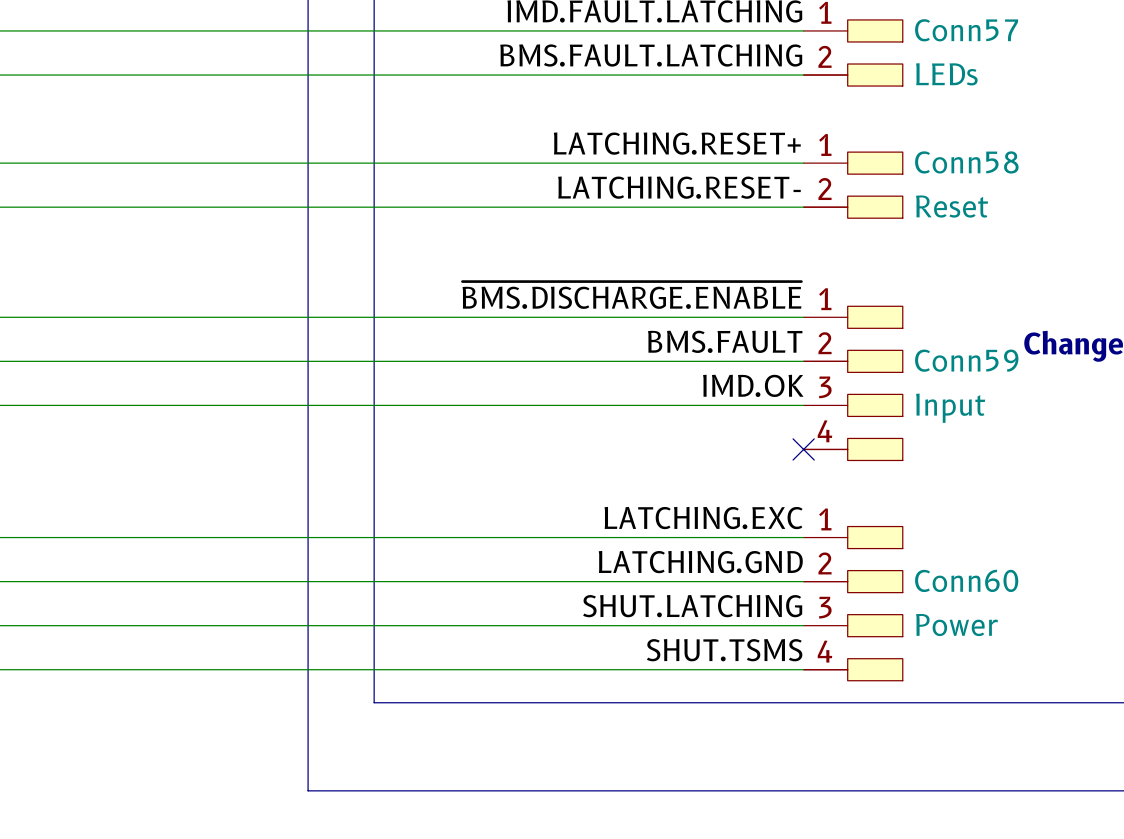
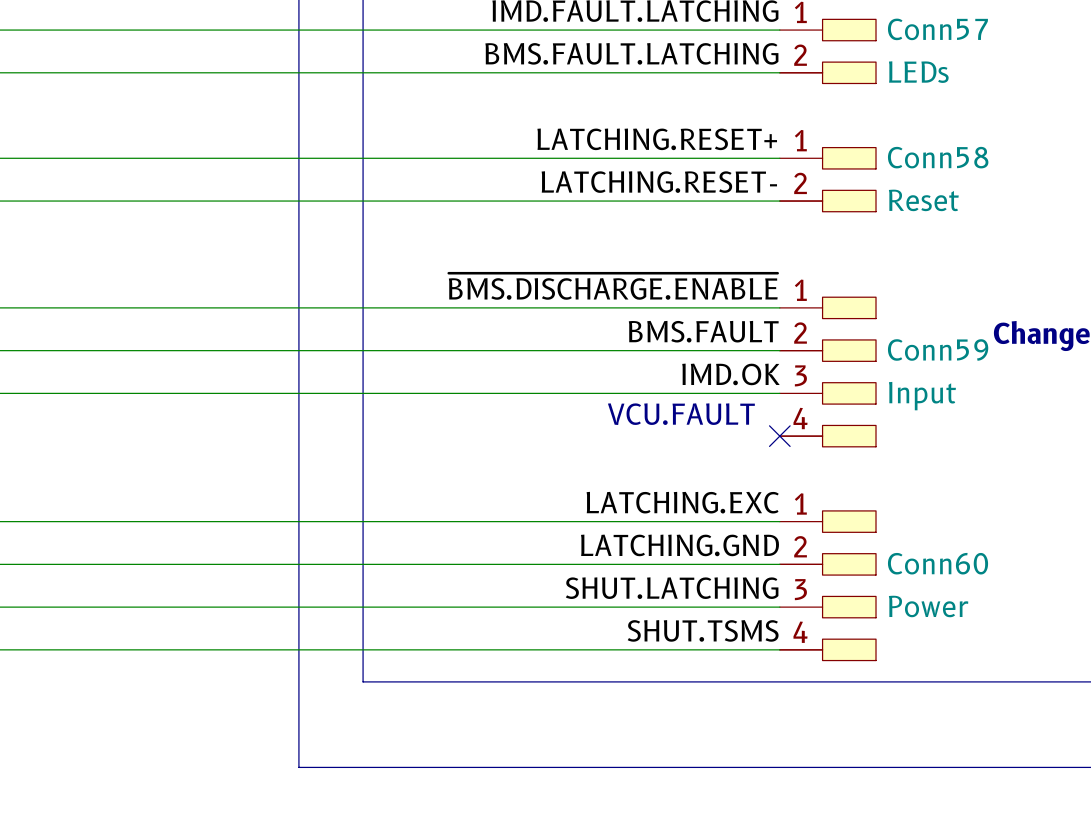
text: none -> VCU.FAULT (681, 414)

